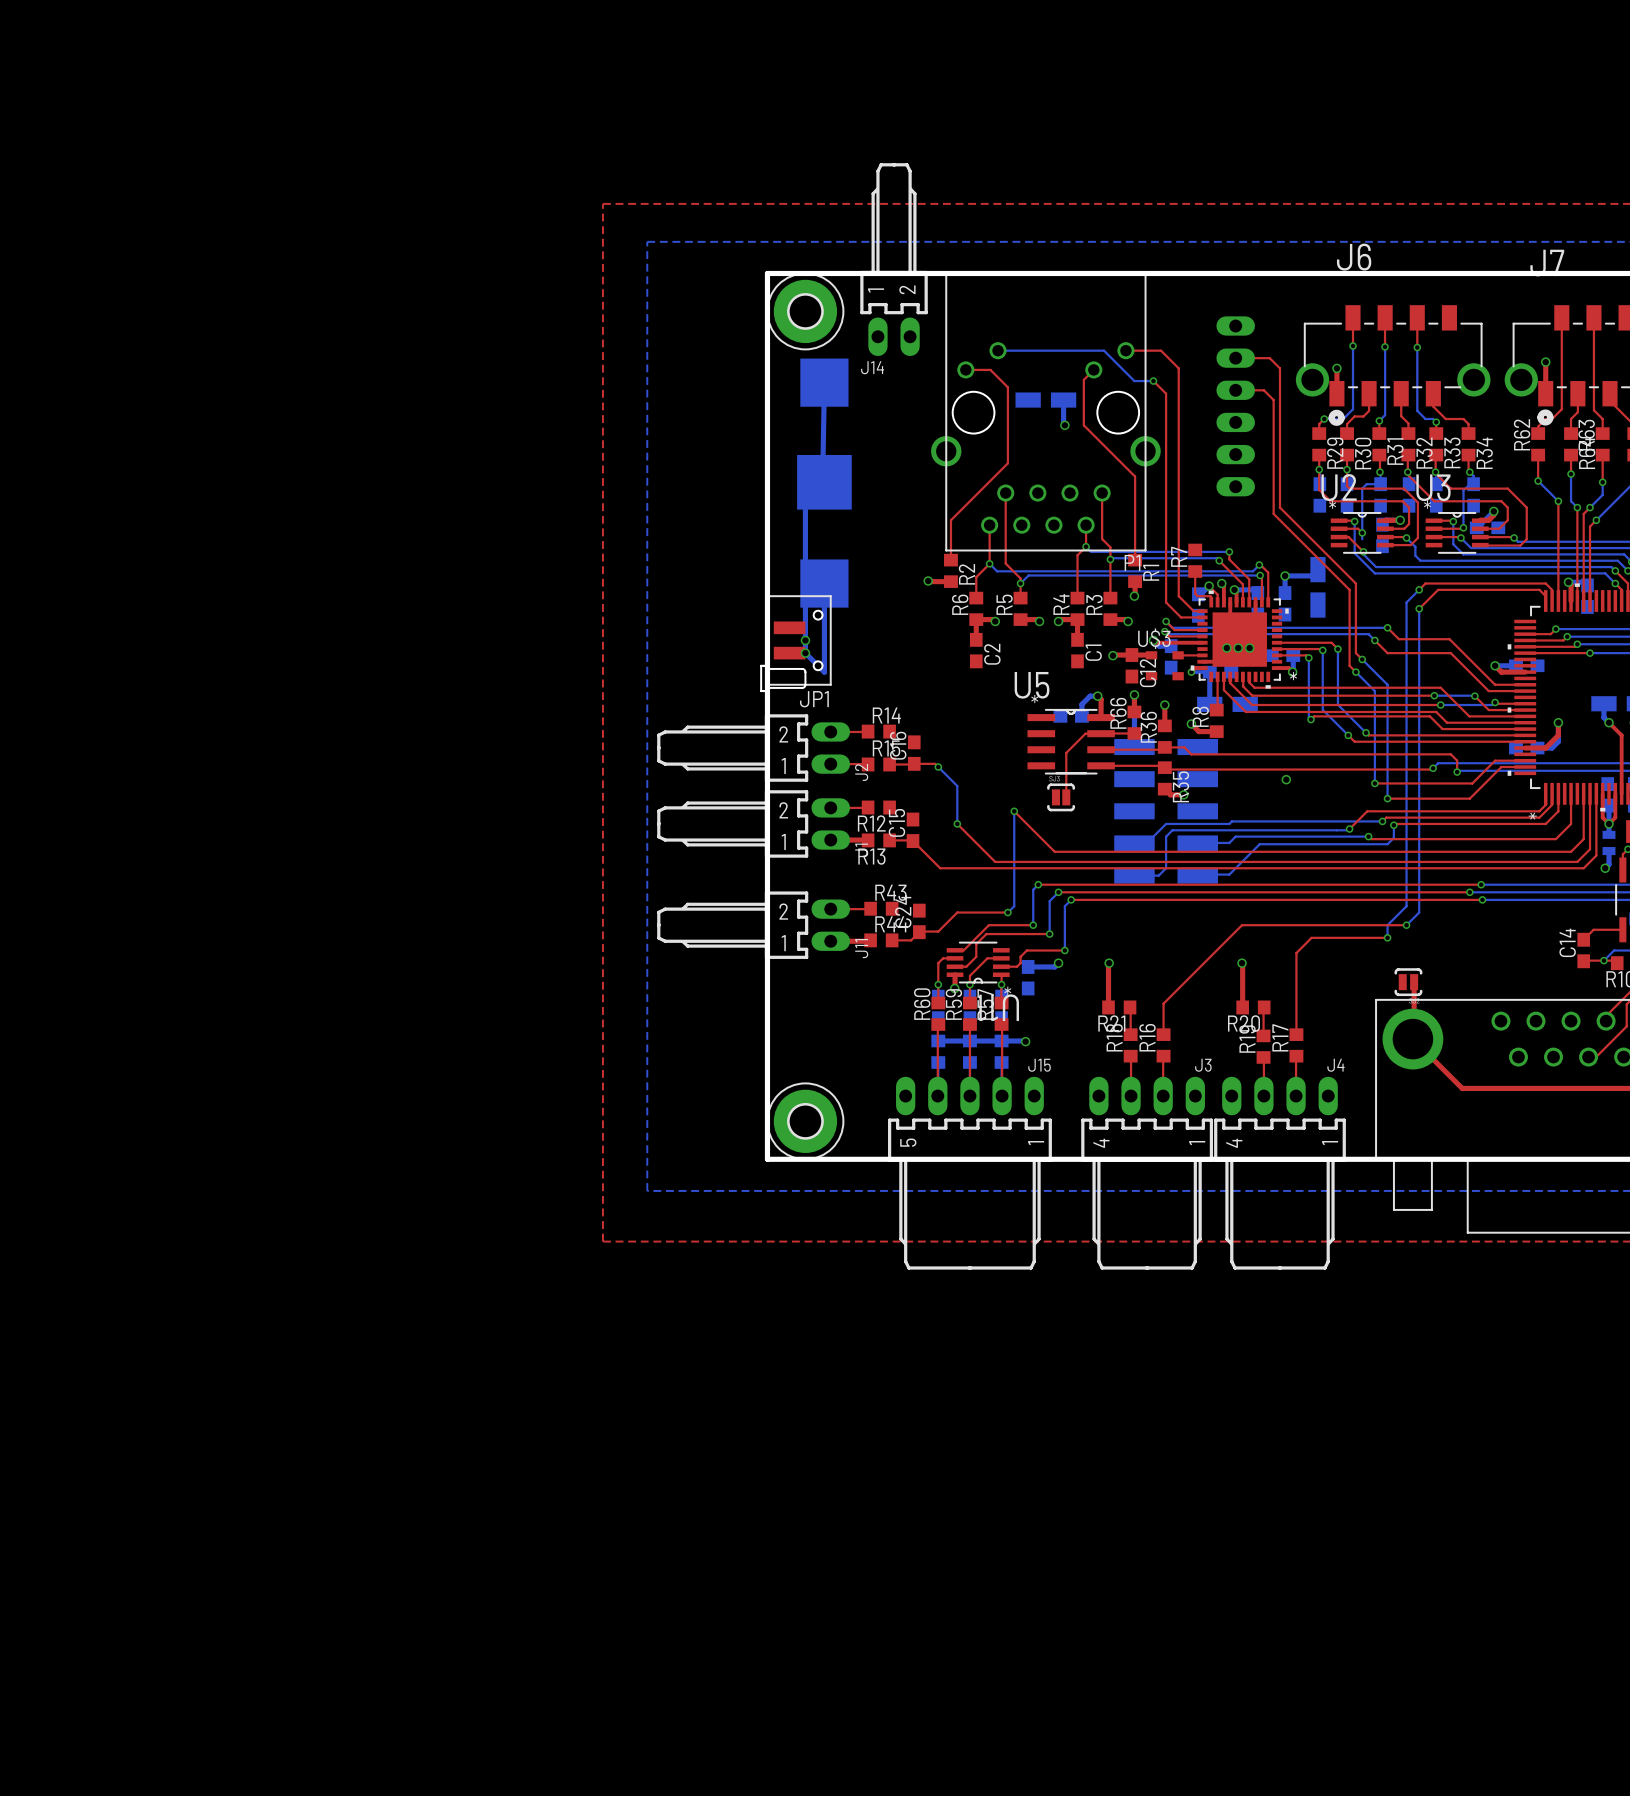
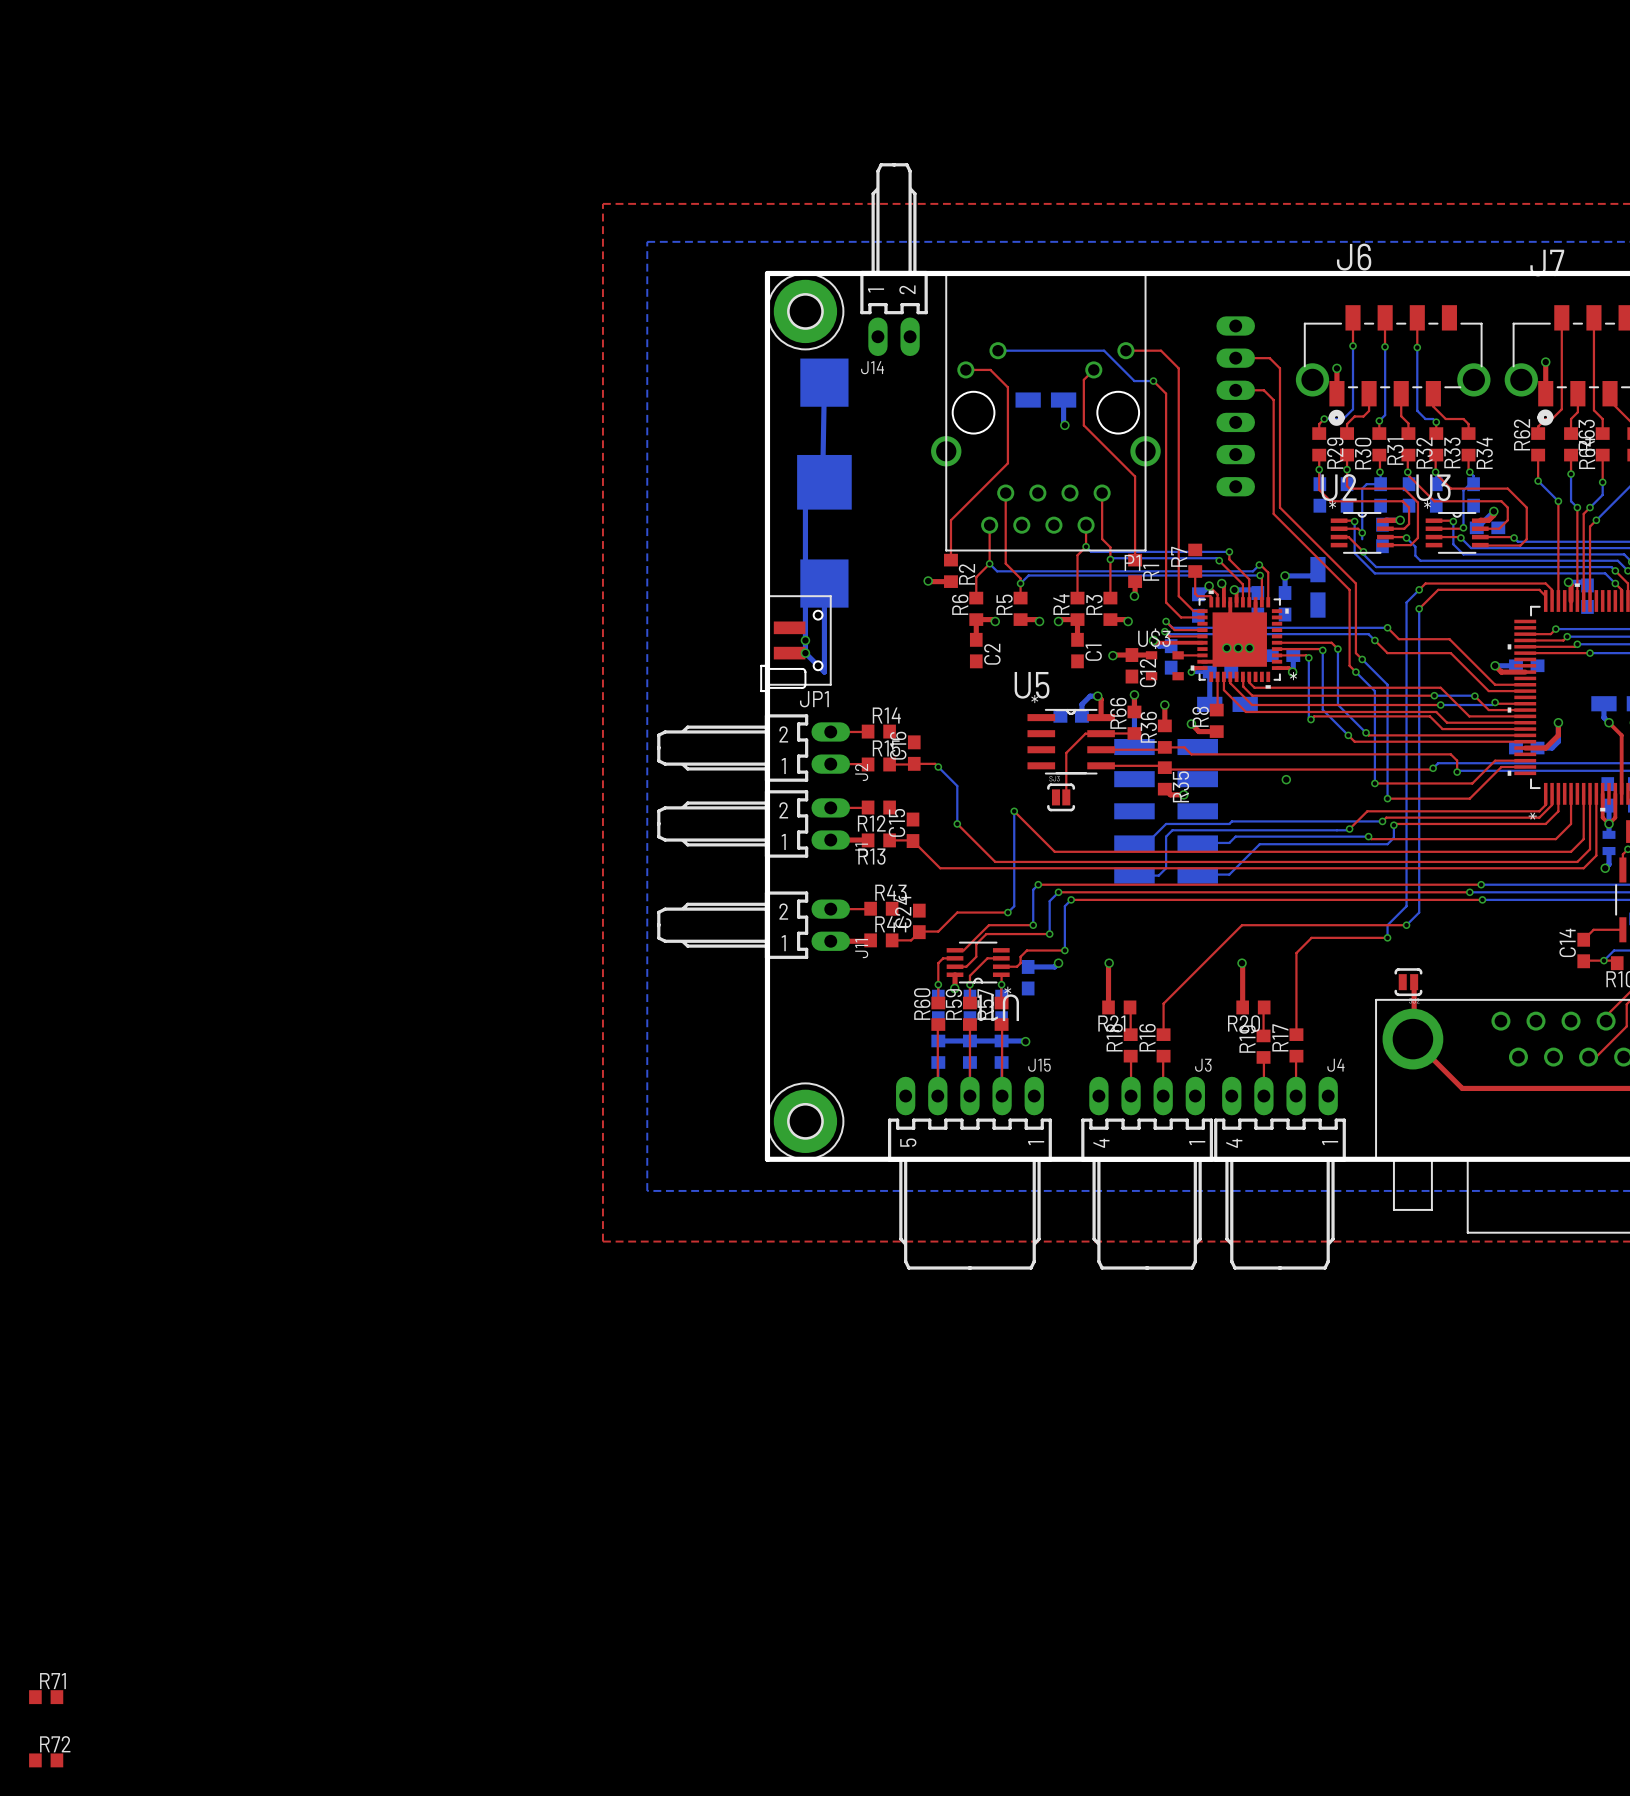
R71: none -> (46, 1697)
R72: none -> (46, 1760)

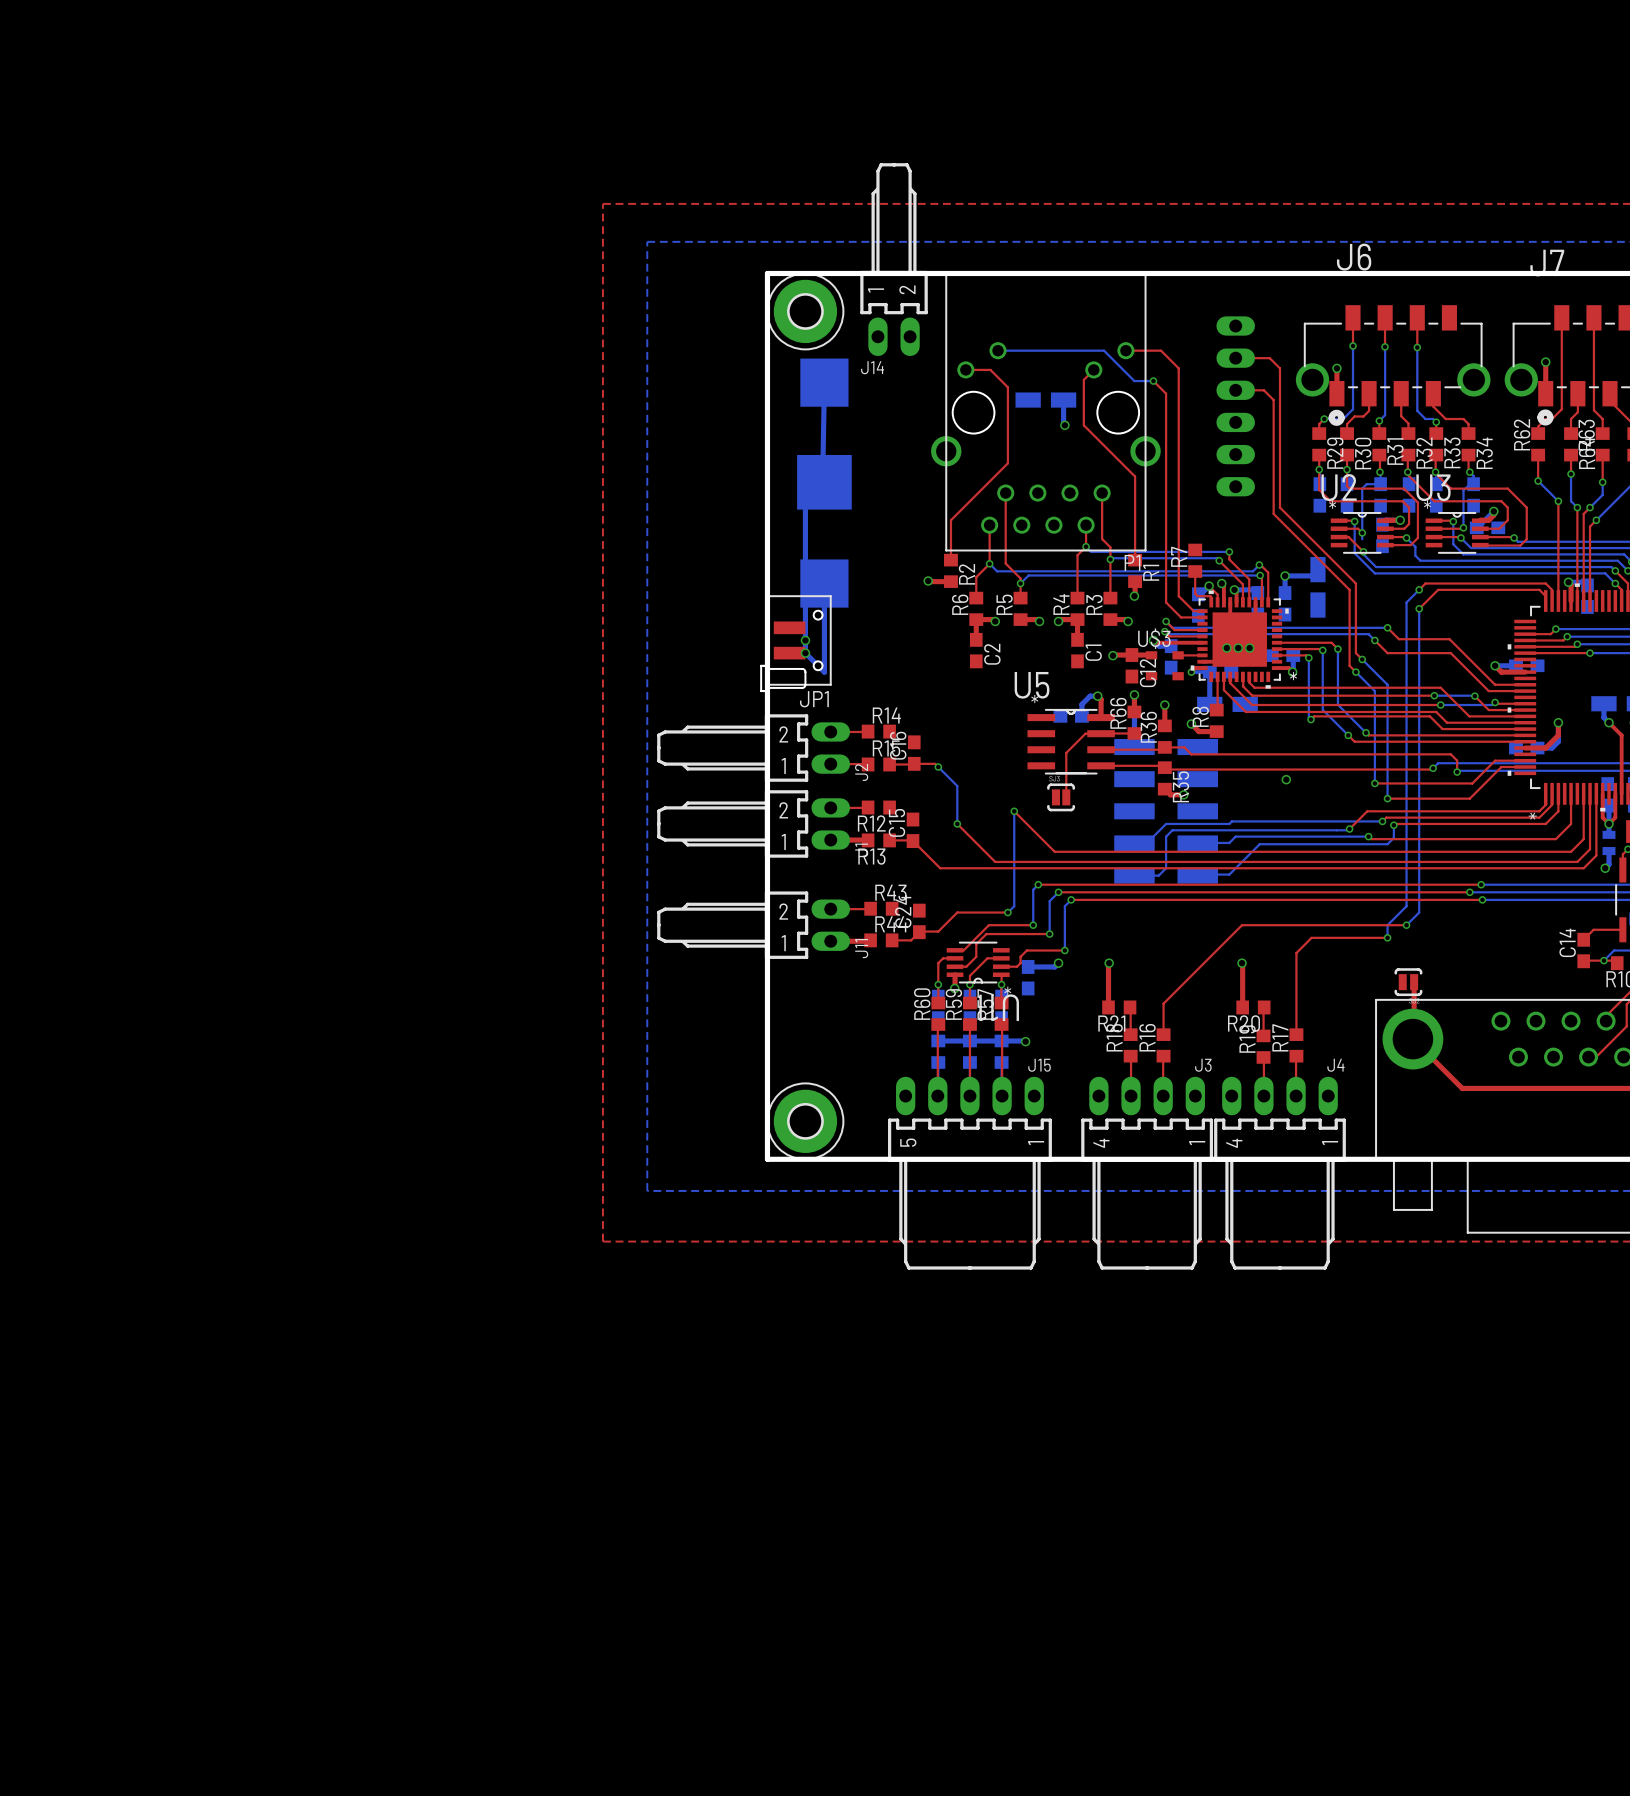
R71: (46, 1697) -> none
R72: (46, 1760) -> none

